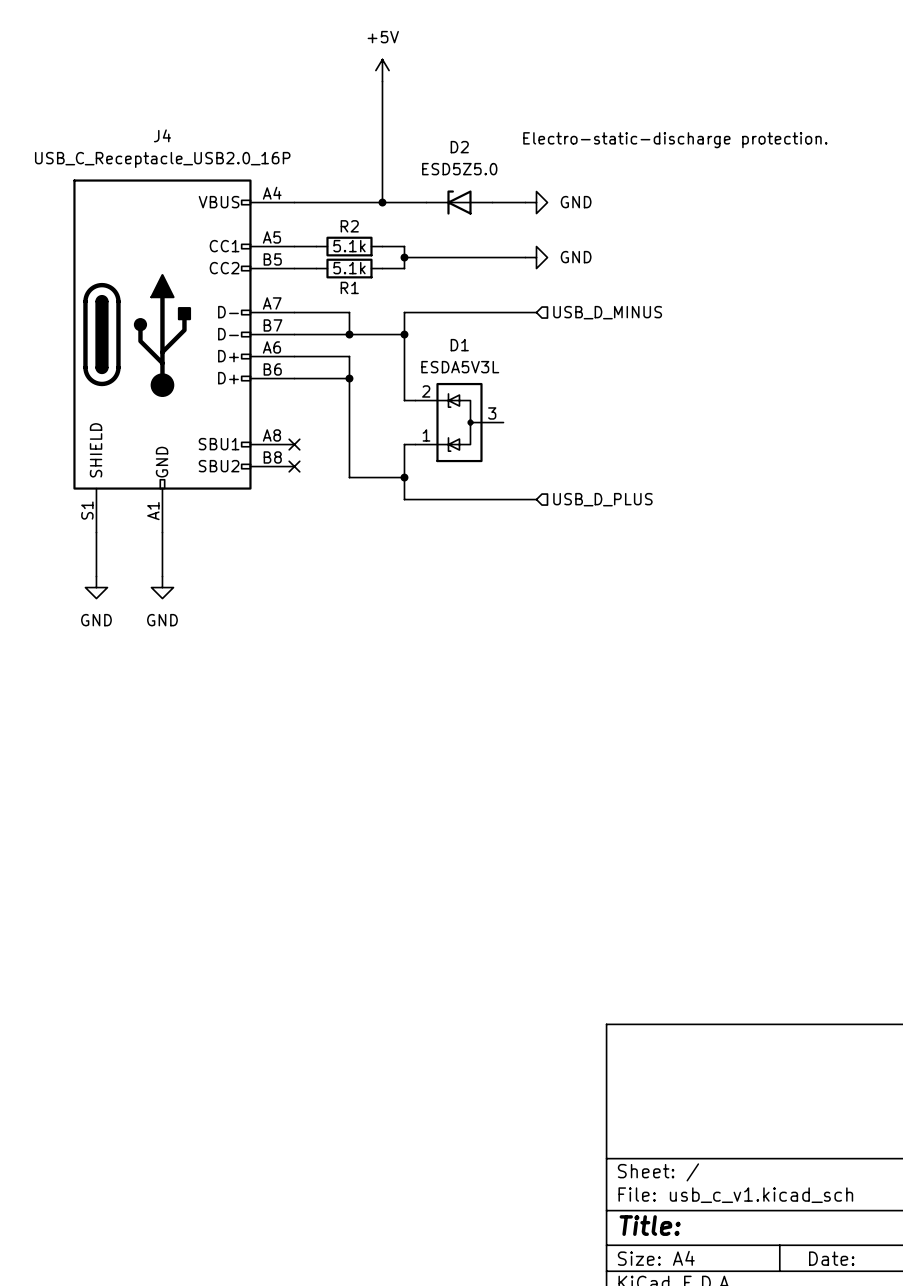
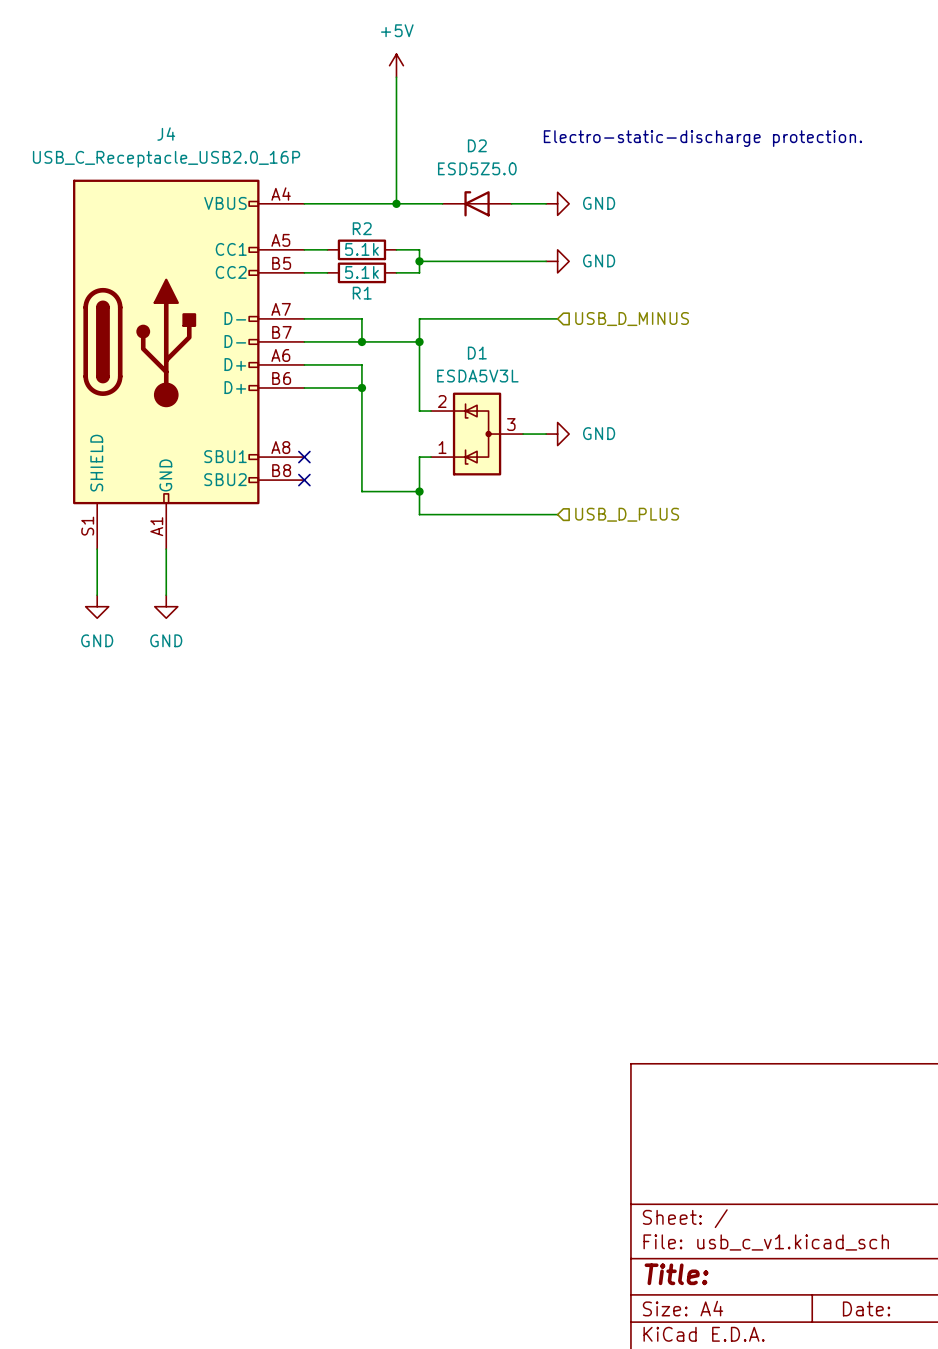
wire: none -> (523, 434) (546, 434)
power symbol: none -> GND (557, 434)

